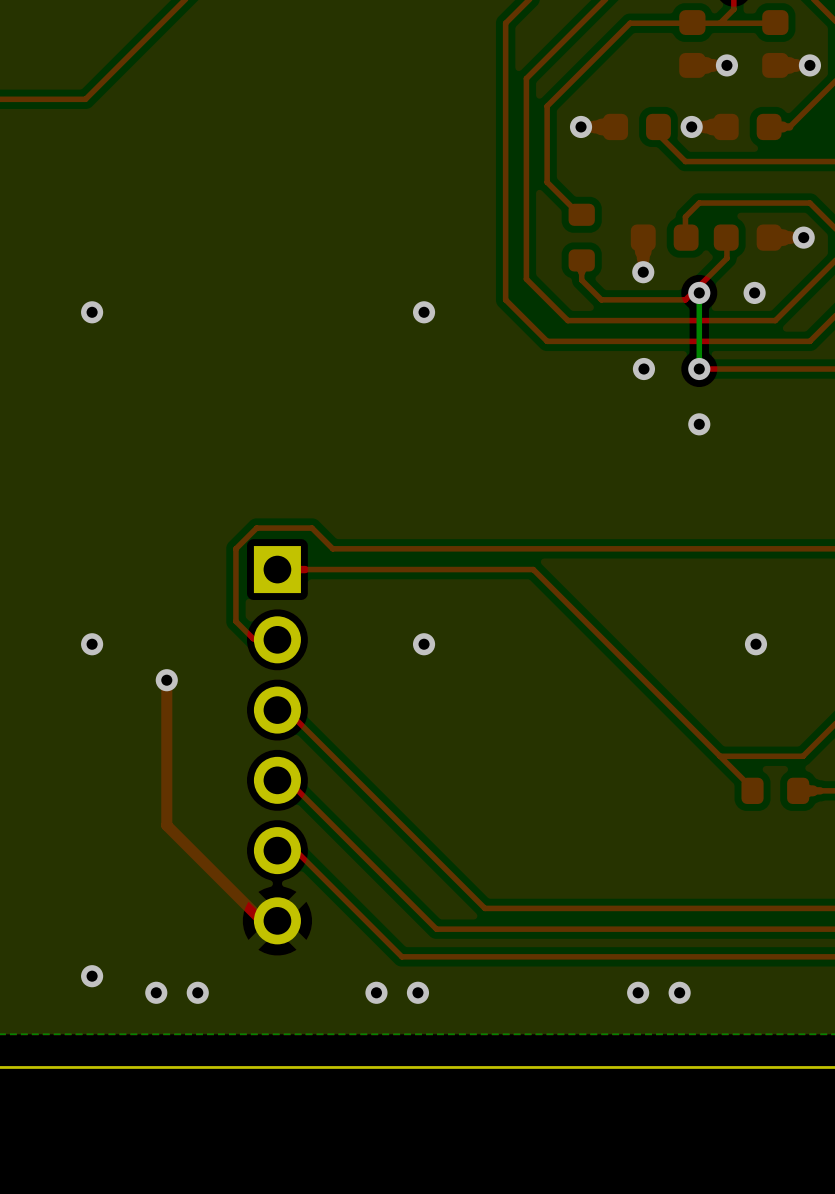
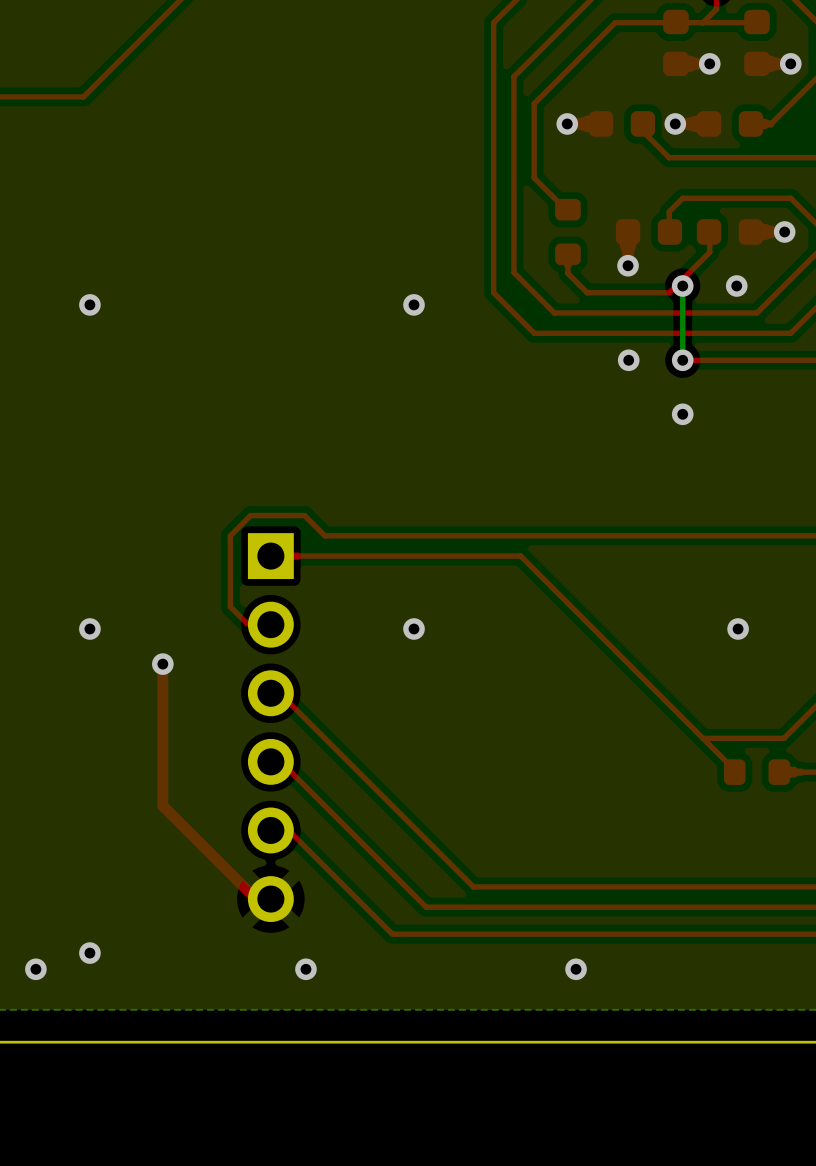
via: none -> (35, 969)
via: (156, 992) -> none
via: (197, 992) -> none
via: none -> (305, 969)
via: (376, 992) -> none
via: (417, 992) -> none
via: none -> (576, 969)
via: (638, 992) -> none
via: (679, 992) -> none

